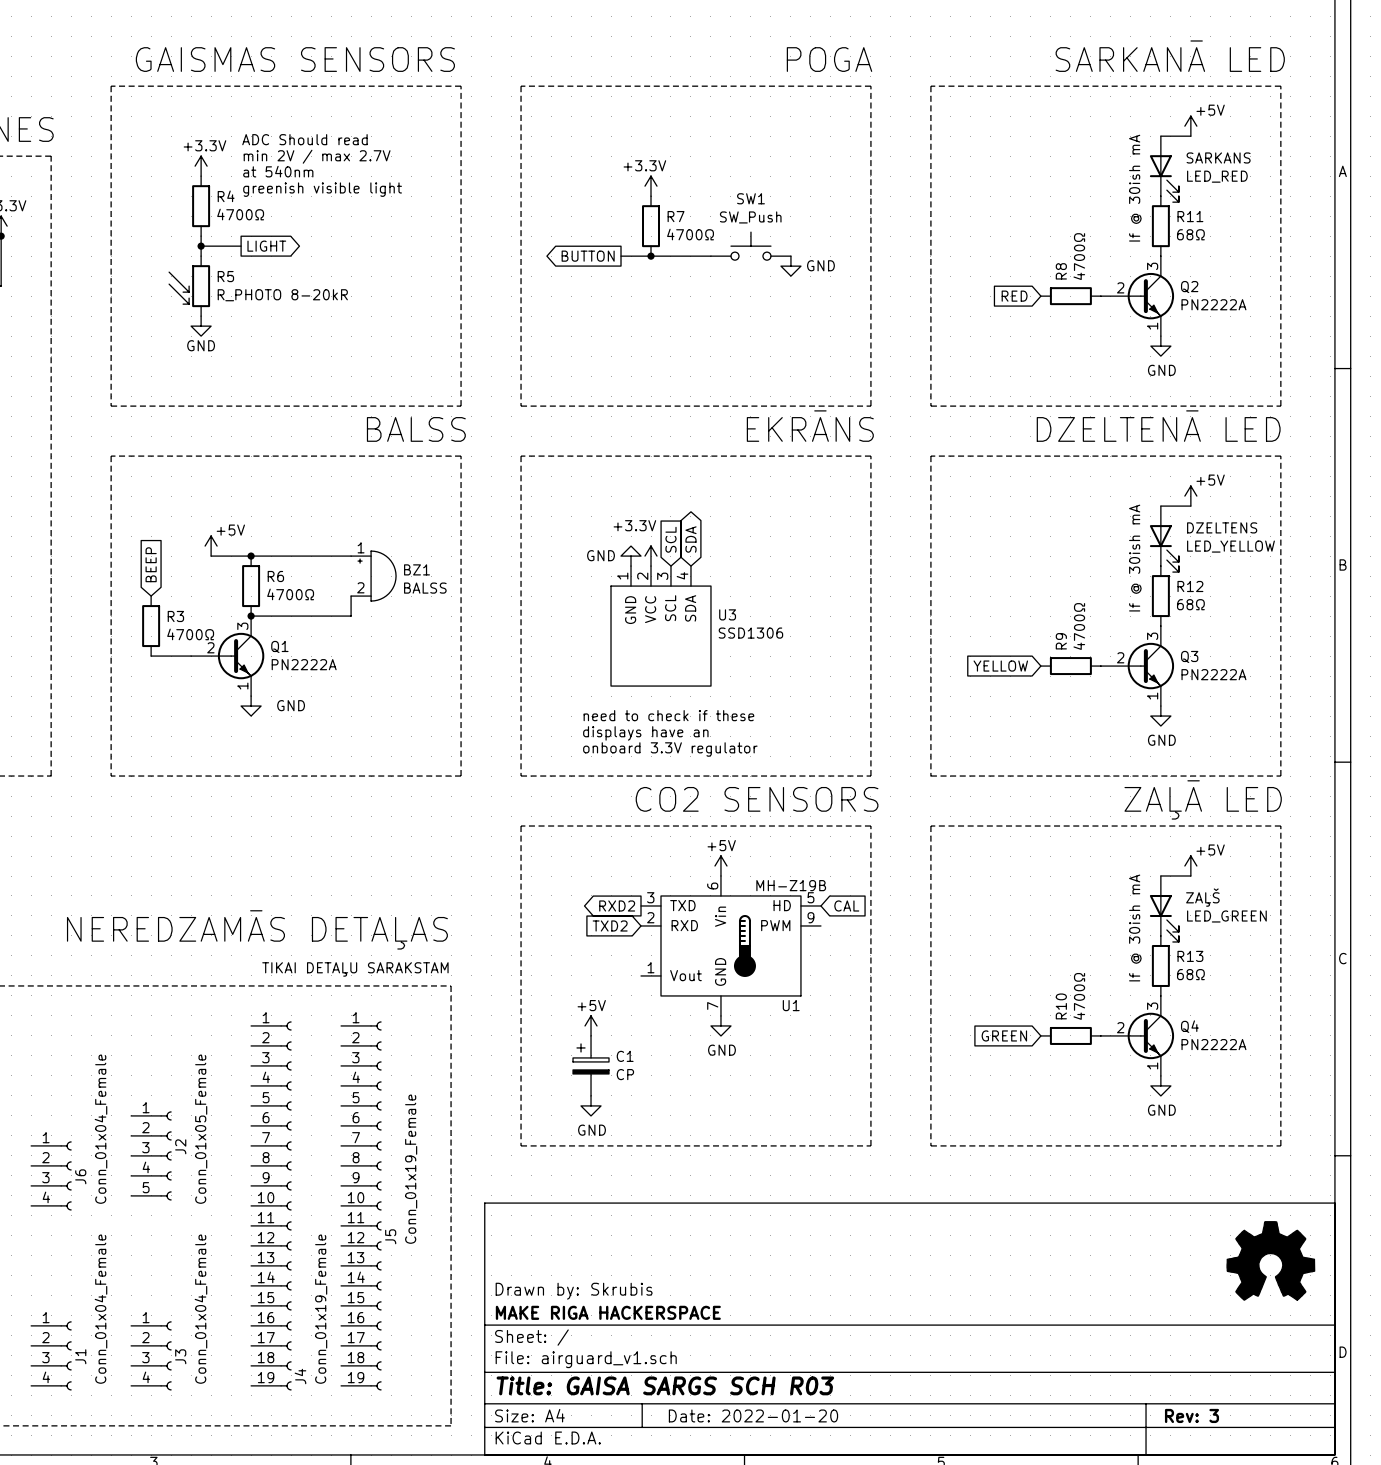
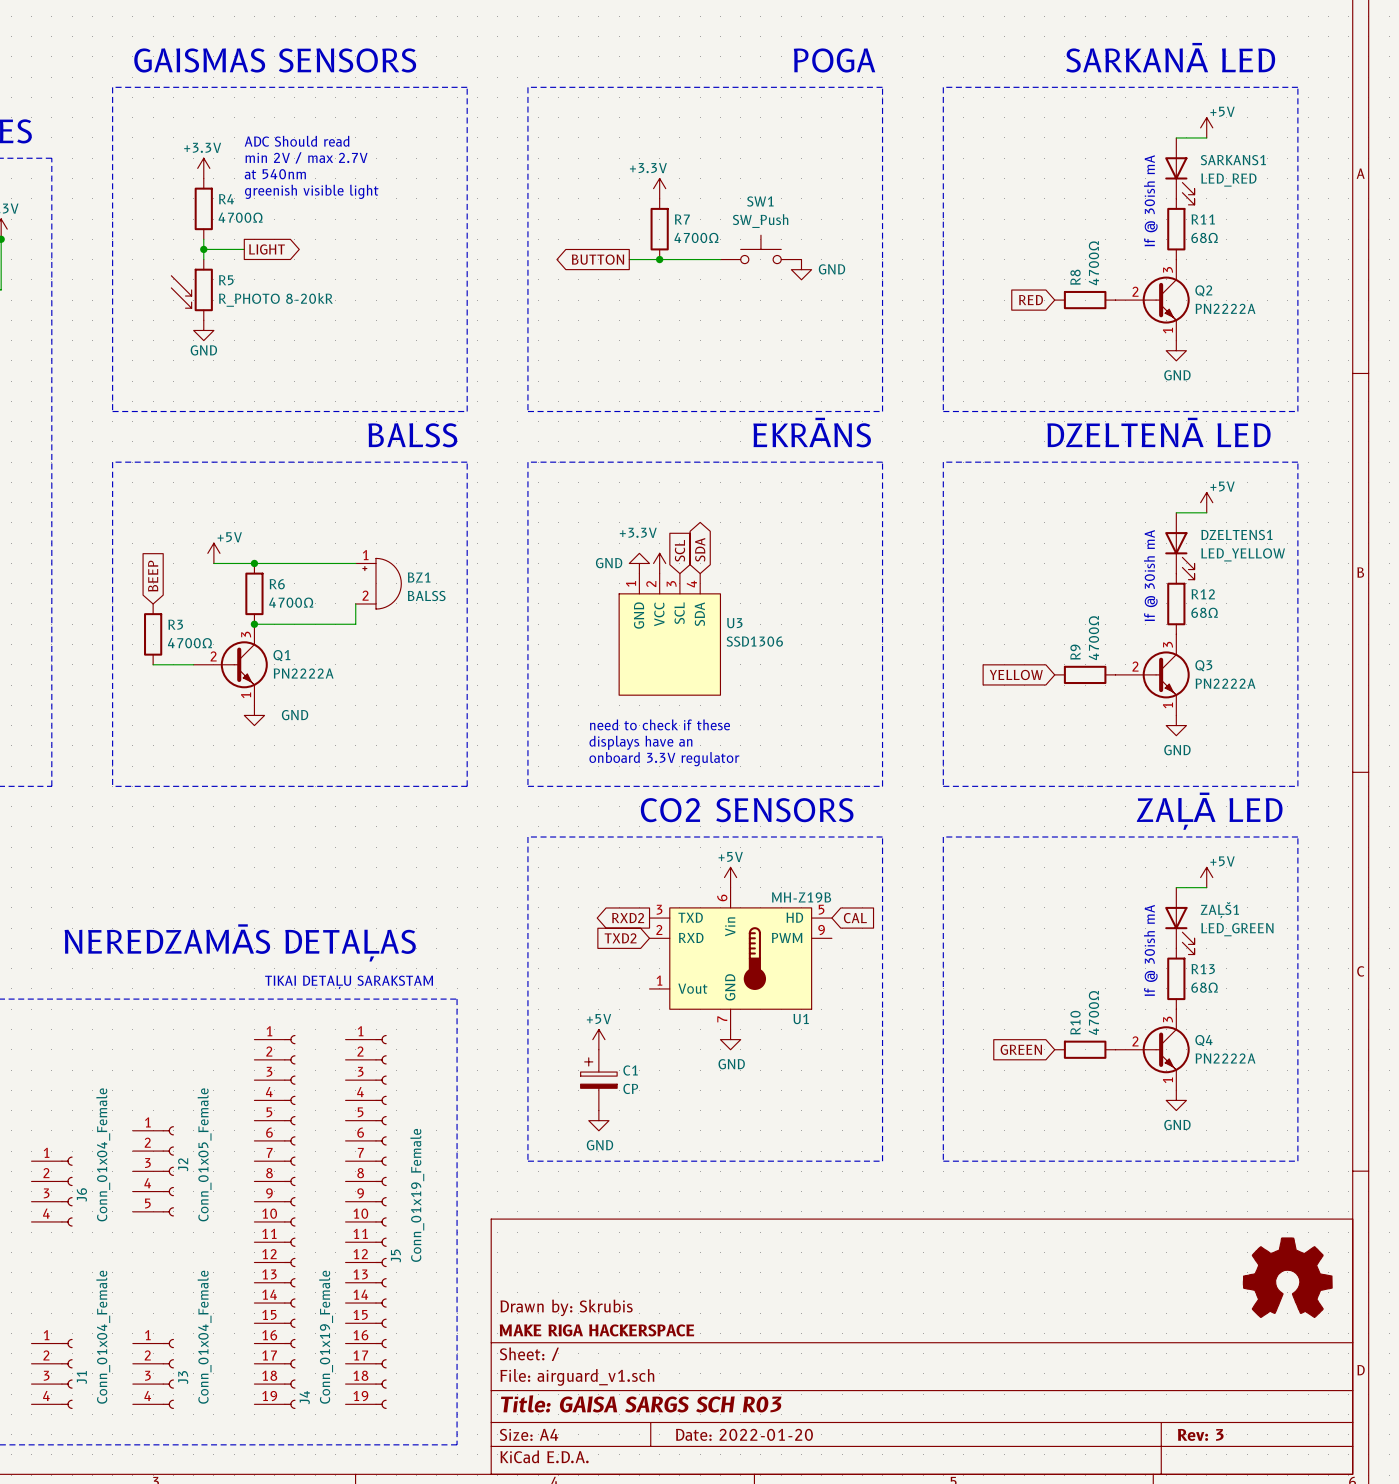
SARKANS name: SARKANS (1218, 157) -> SARKANS1 (1233, 160)
DZELTENS name: DZELTENS (1222, 527) -> DZELTENS1 (1236, 534)
ZAĻŠ name: ZAĻŠ (1202, 897) -> ZAĻŠ1 (1219, 910)

